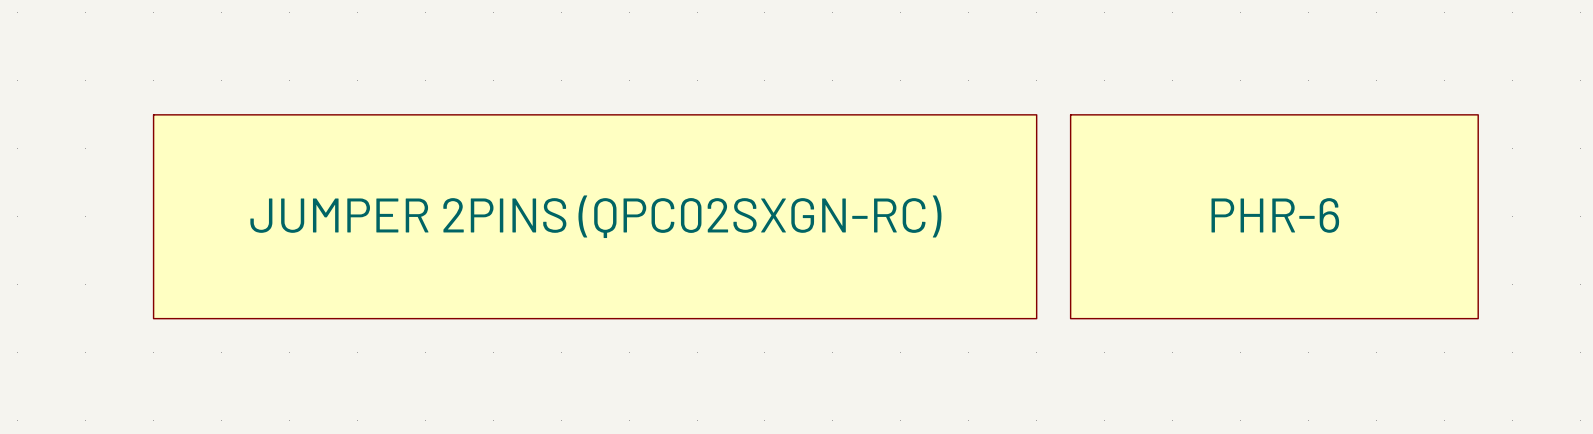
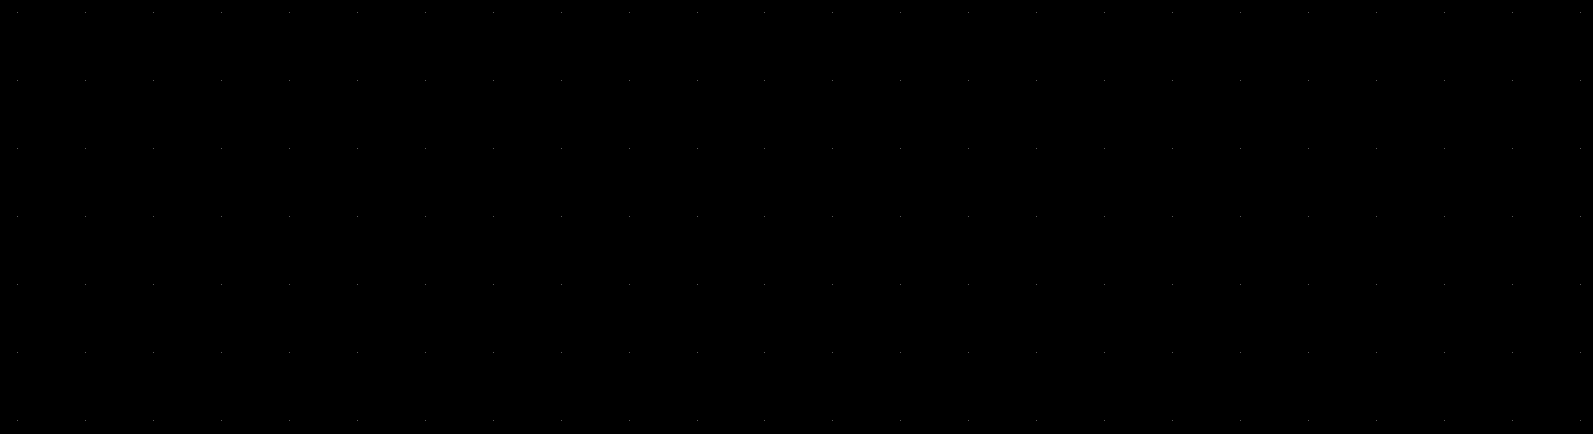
part: JUMPER 2PINS (QPC02SXGN-RC) (595, 216) -> none
part: PHR-6 (1274, 216) -> none

